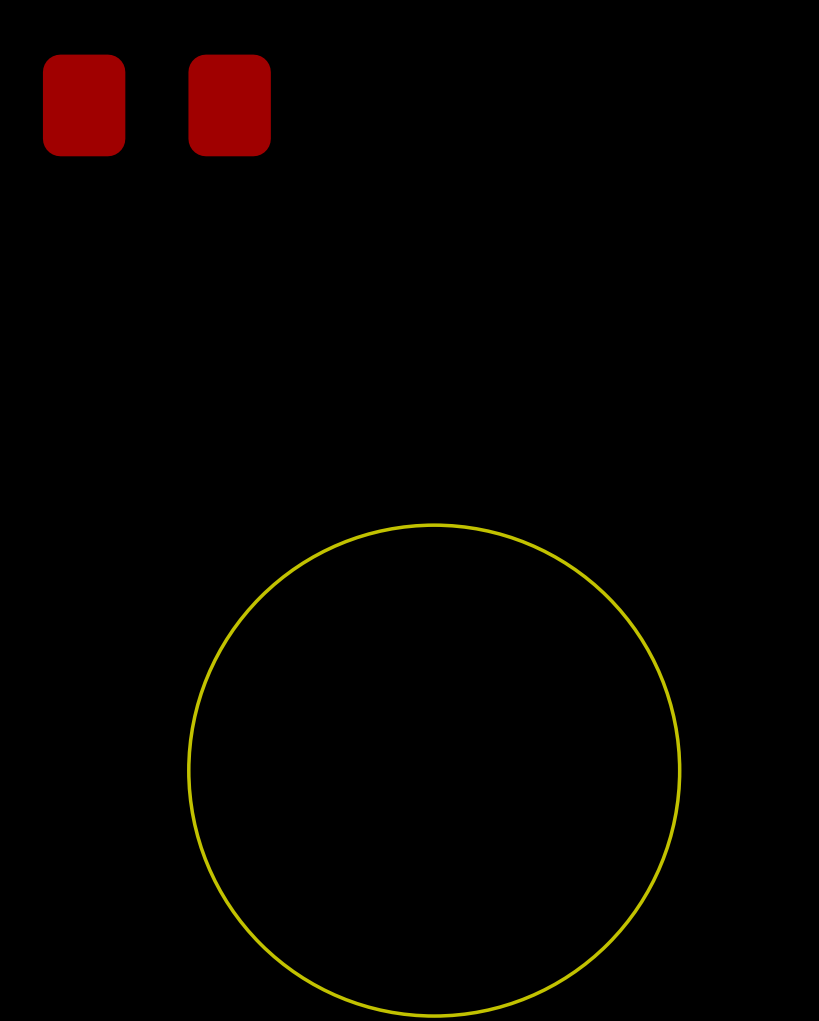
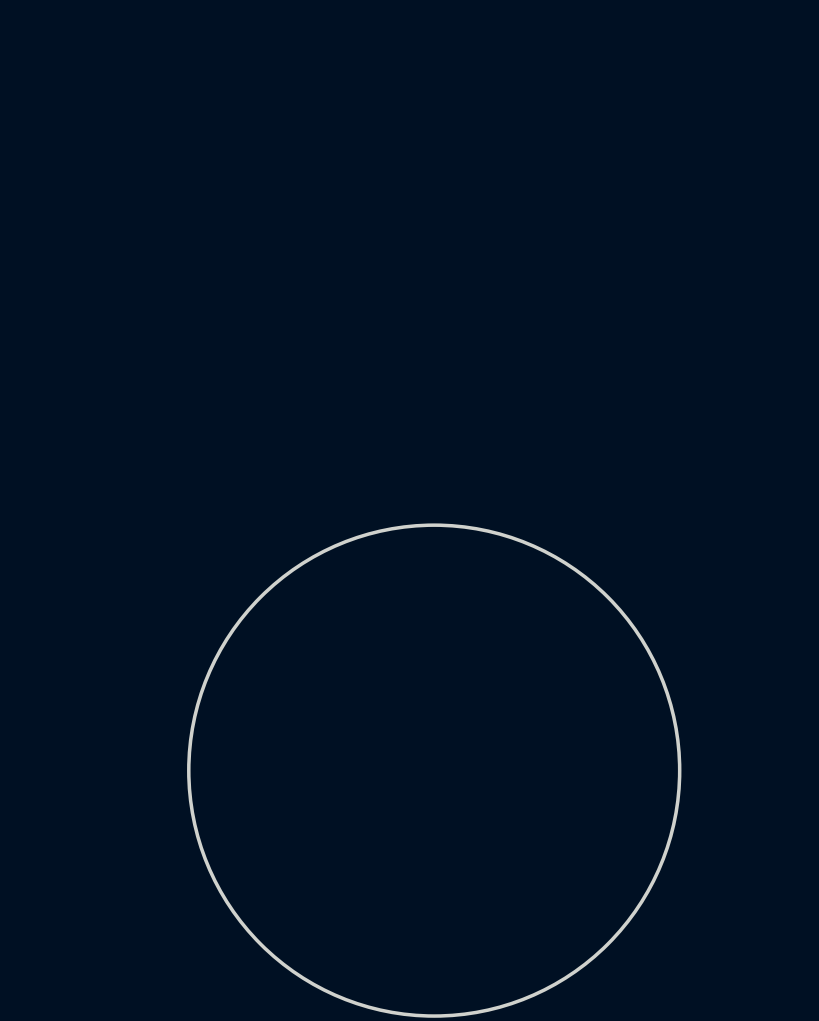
part: (156, 105) -> none

